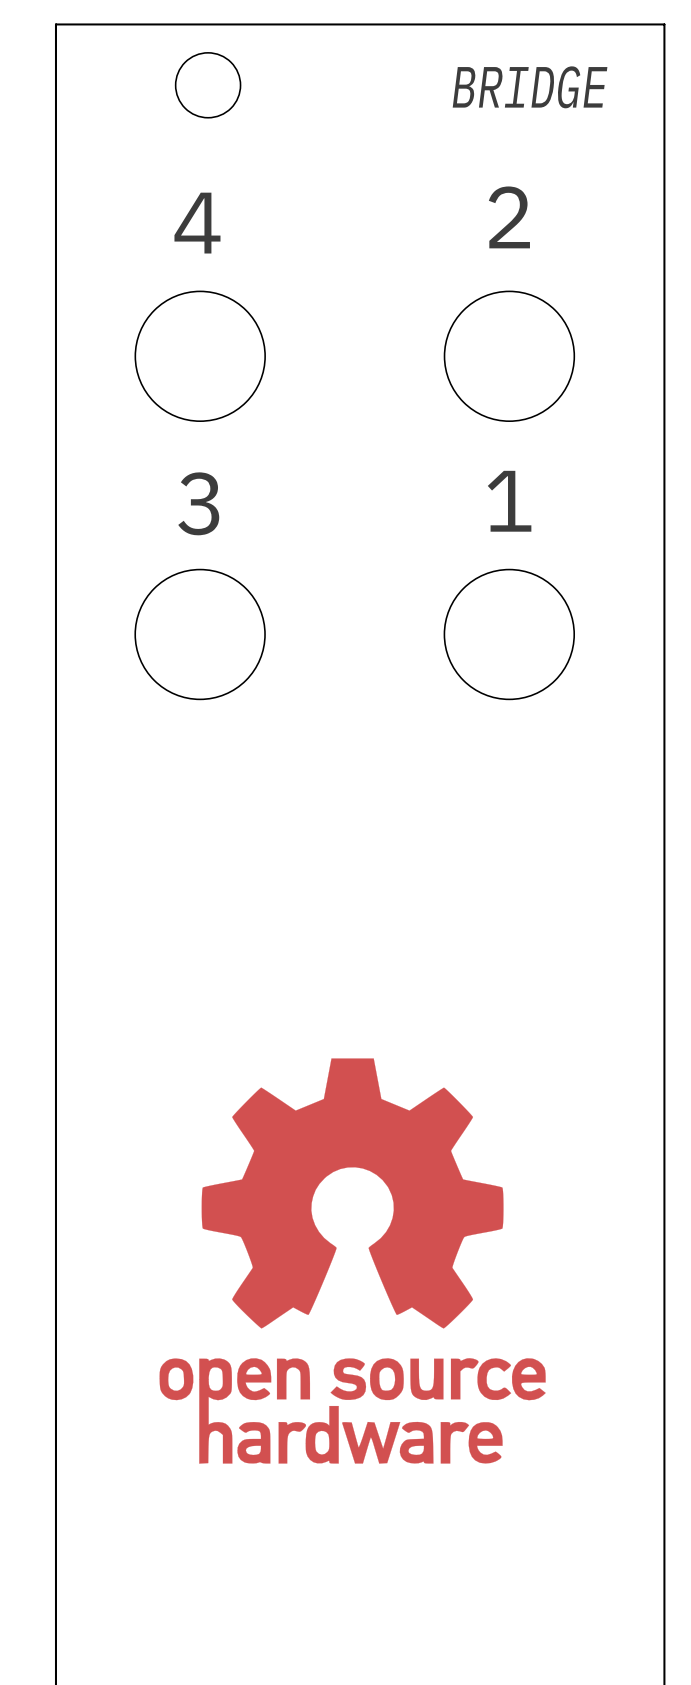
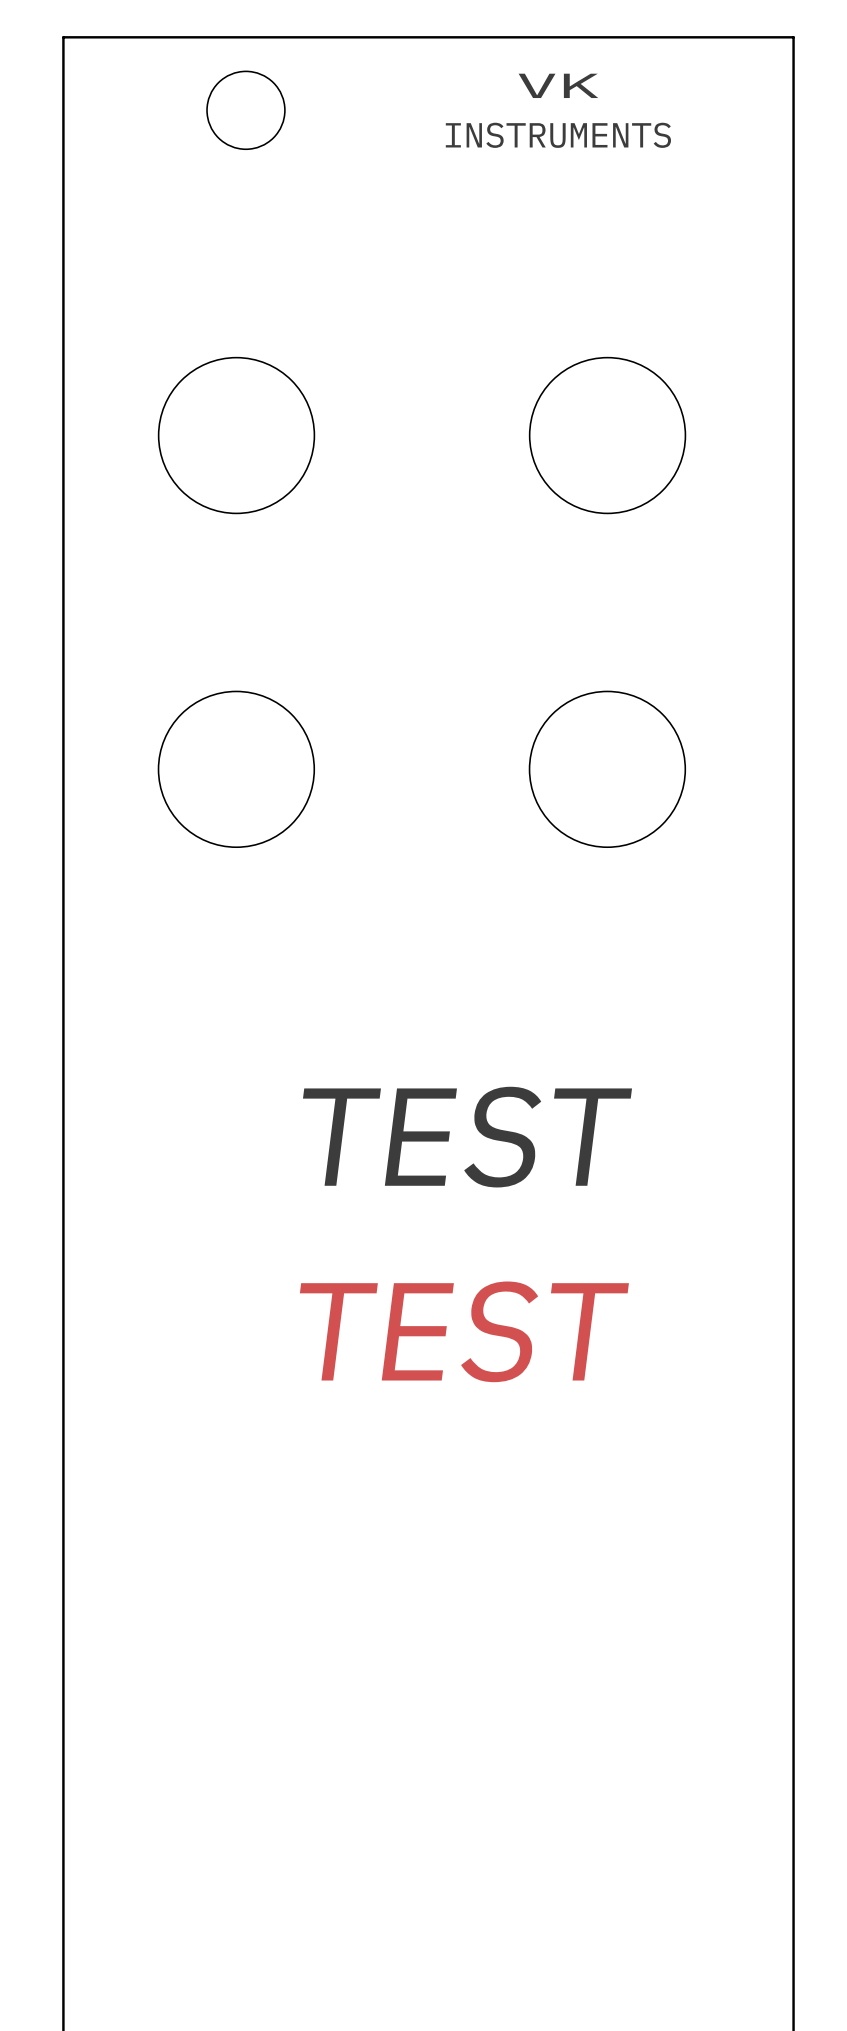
text: none -> VK (558, 85)
text: BRIDGE (530, 87) -> none
text: none -> INSTRUMENTS (558, 135)
text: 2 (509, 217) -> none
text: 4 (197, 223) -> none
text: 1 (509, 501) -> none
text: 3 (198, 503) -> none
text: none -> TEST (467, 1137)
drawing: [159, 1058, 546, 1464] -> none
text: none -> TEST (464, 1331)

